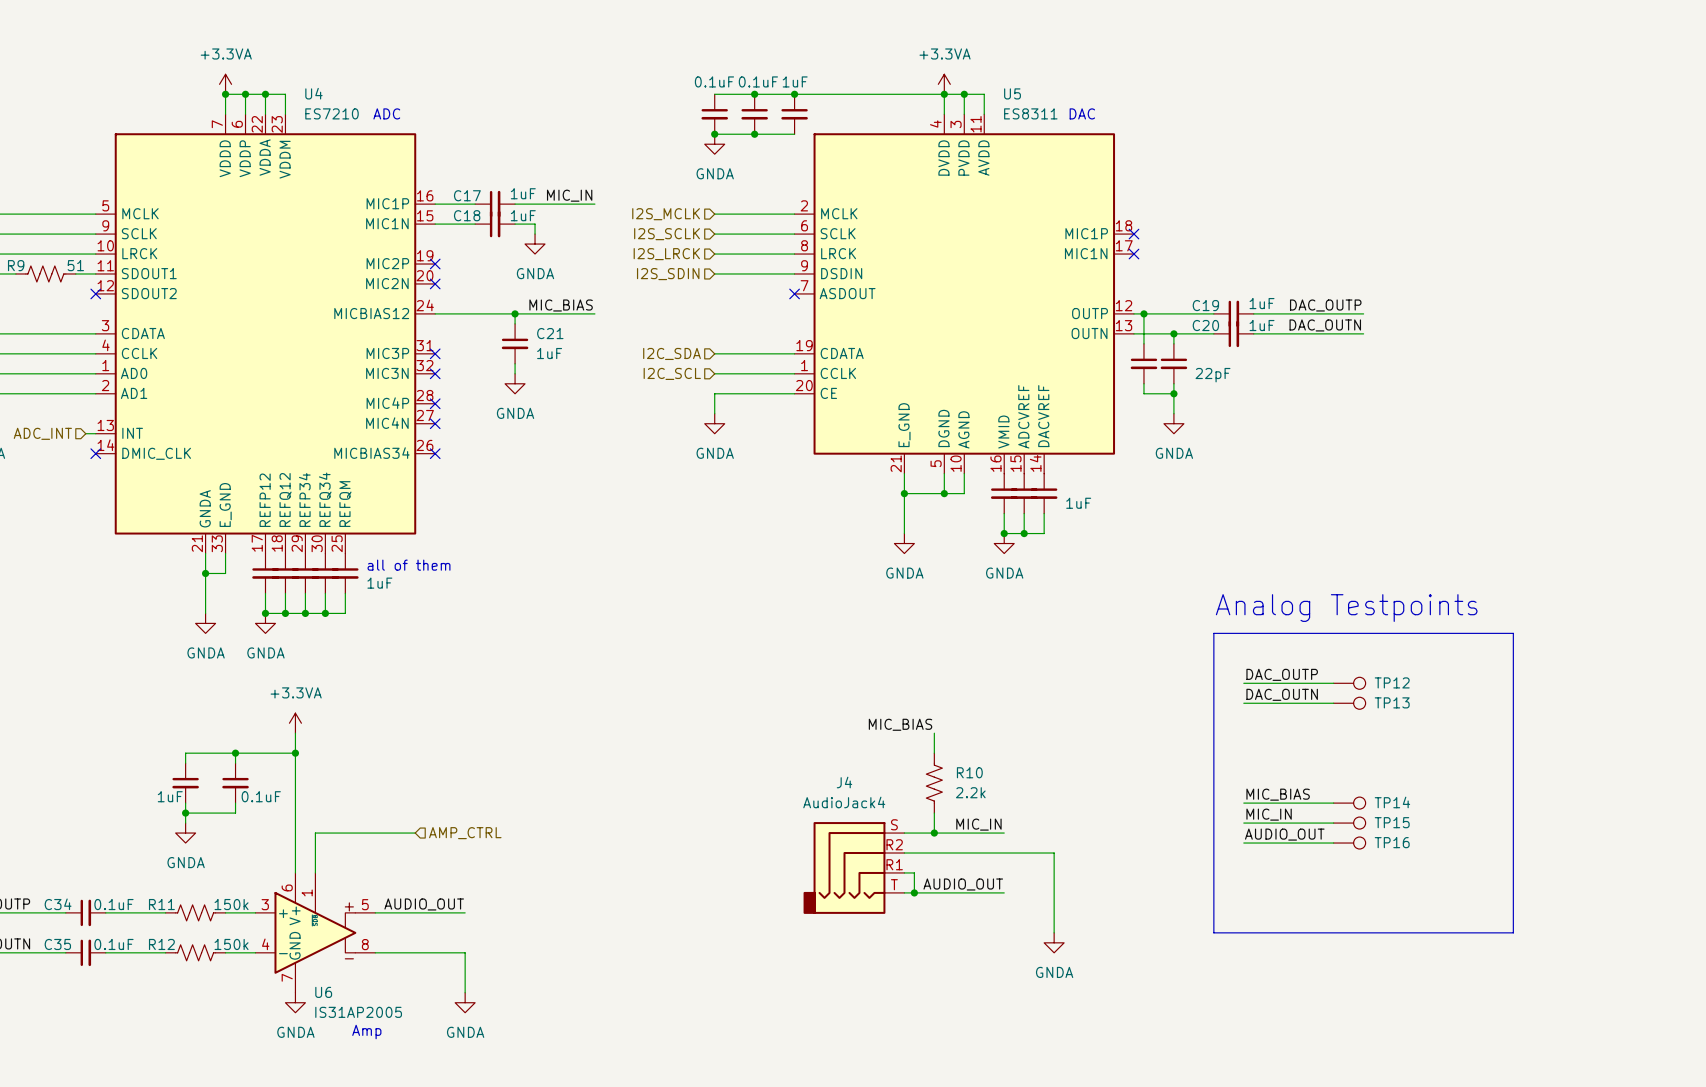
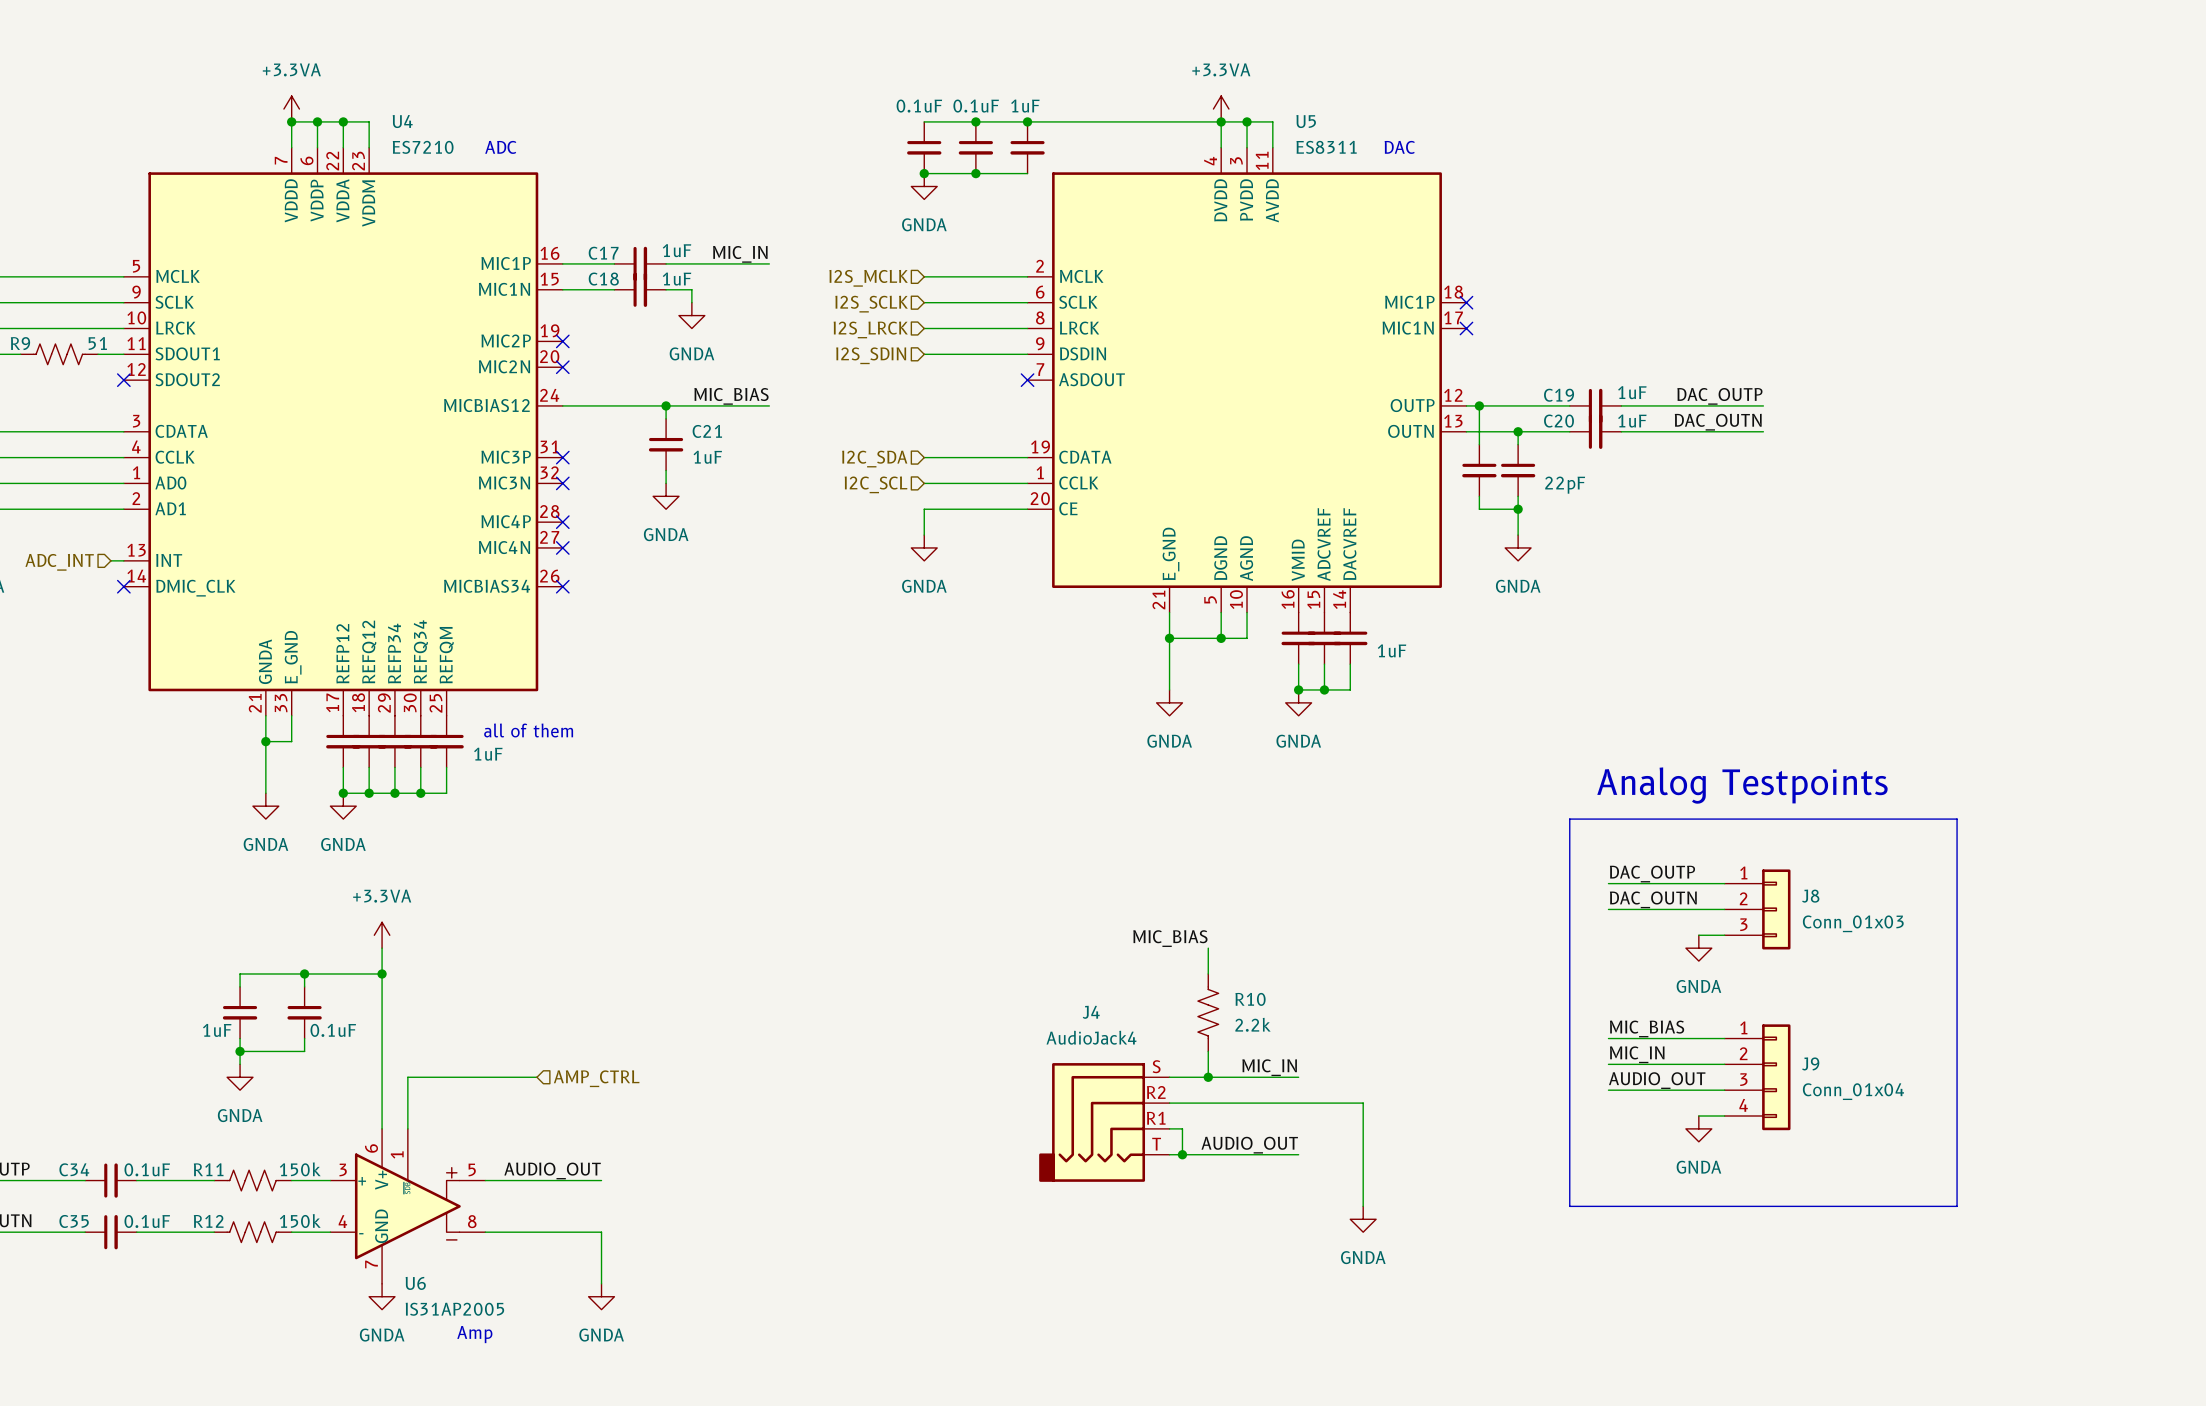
TP12: (1349, 683) -> none
TP13: (1349, 703) -> none
J8: none -> Conn_01x03 (1757, 909)
wire: none -> (1698, 935) (1724, 935)
power symbol: none -> GNDA (1698, 948)
TP14: (1349, 803) -> none
TP15: (1349, 823) -> none
J9: none -> Conn_01x04 (1757, 1077)
TP16: (1349, 843) -> none
wire: none -> (1698, 1116) (1724, 1116)
power symbol: none -> GNDA (1698, 1128)

